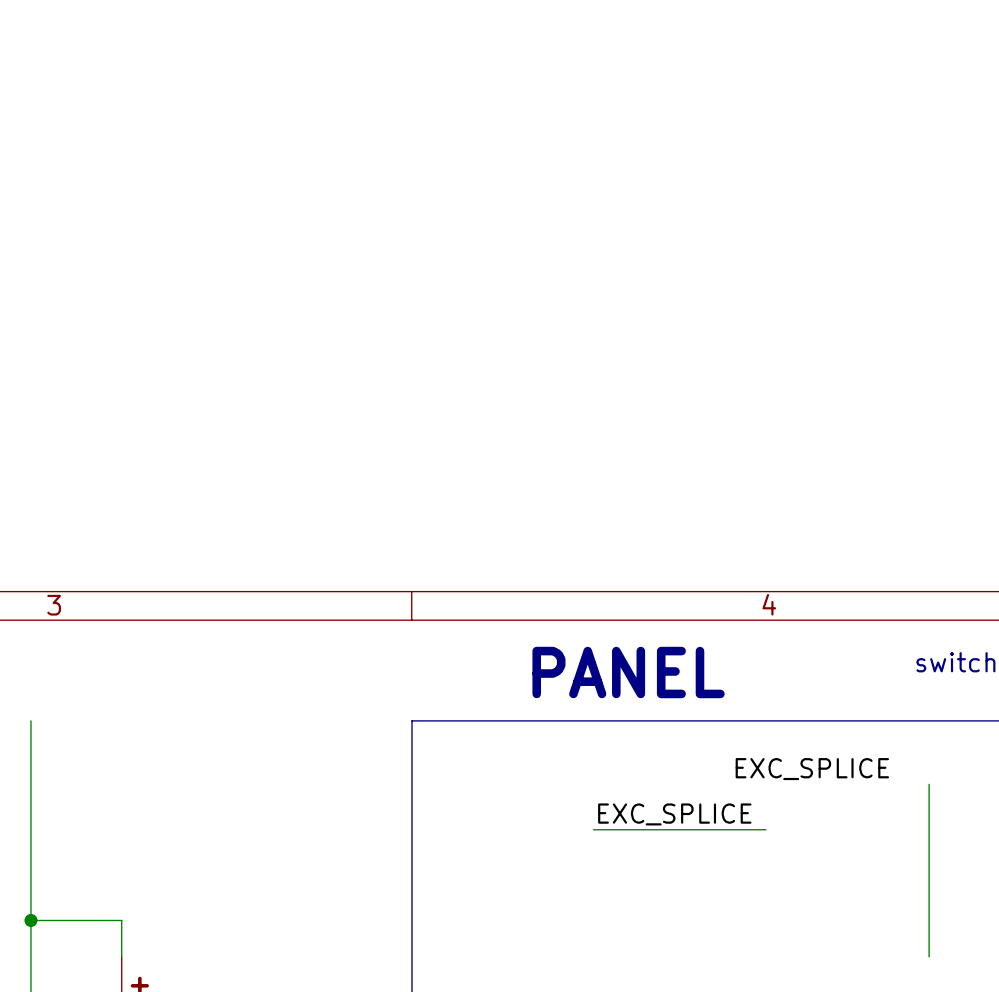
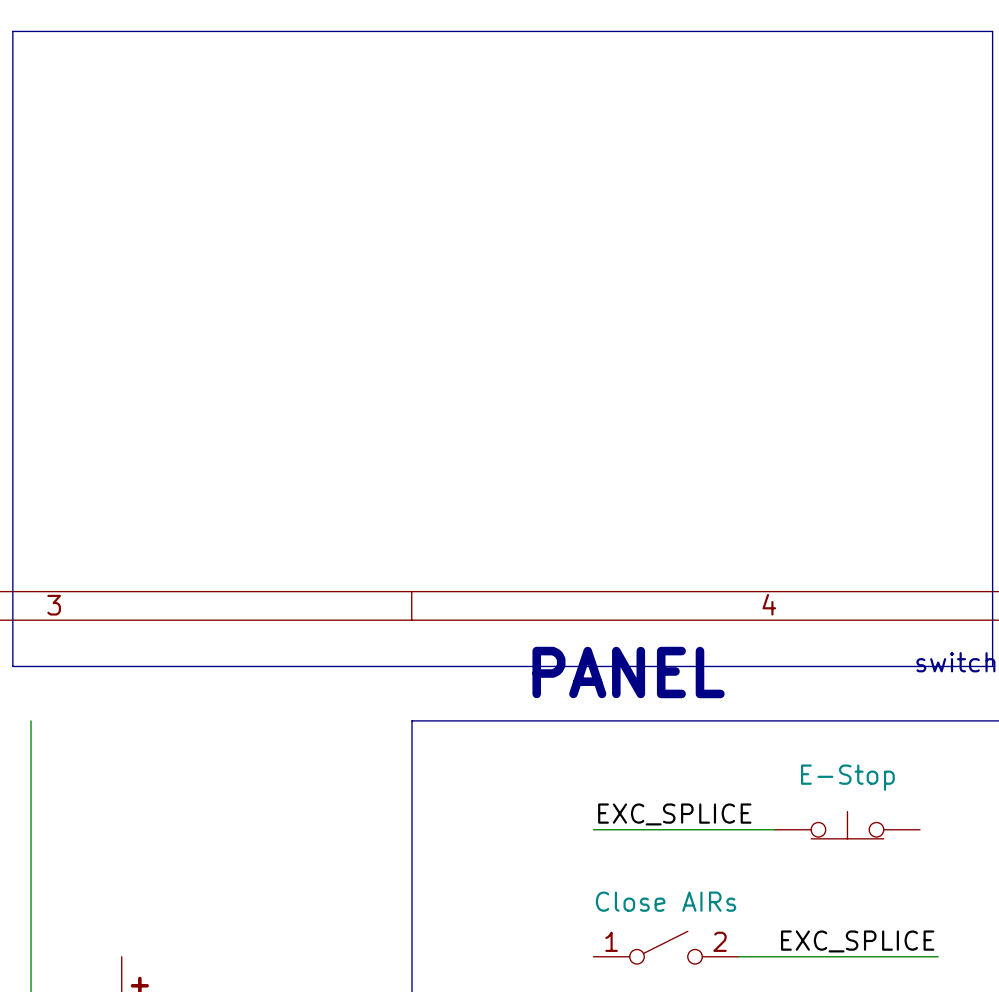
line: none -> (12, 31) (992, 31) (992, 666) (12, 666) (12, 31)
label: EXC_SPLICE (812, 769) -> none
wire: (929, 784) (929, 956) -> none
part: none -> E-Stop (847, 825)
wire: none -> (765, 829) (774, 829)
wire: (30, 920) (121, 920) (121, 956) -> none
junction: (30, 920) -> none
label: none -> EXC_SPLICE (857, 941)
part: none -> Close AIRs (666, 947)
wire: none -> (738, 956) (938, 956)

